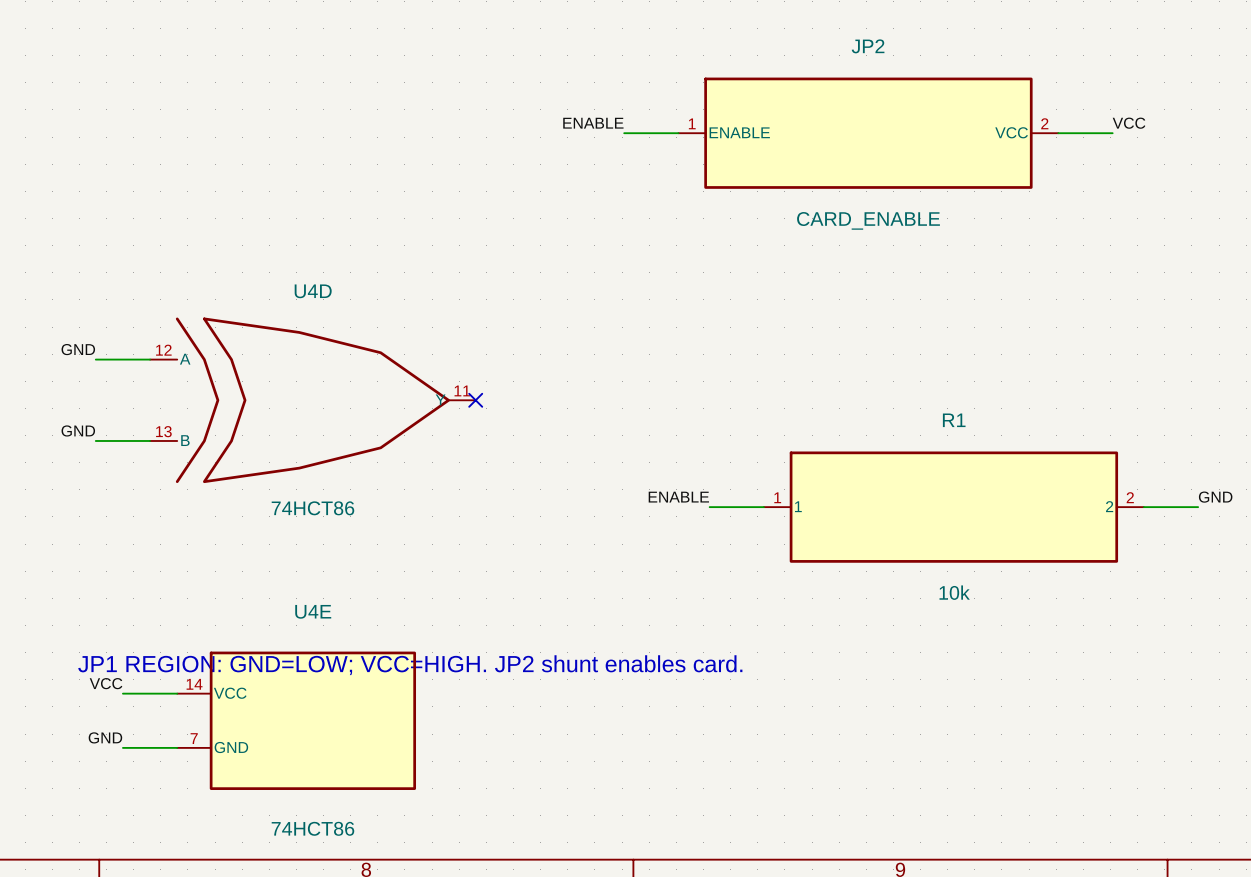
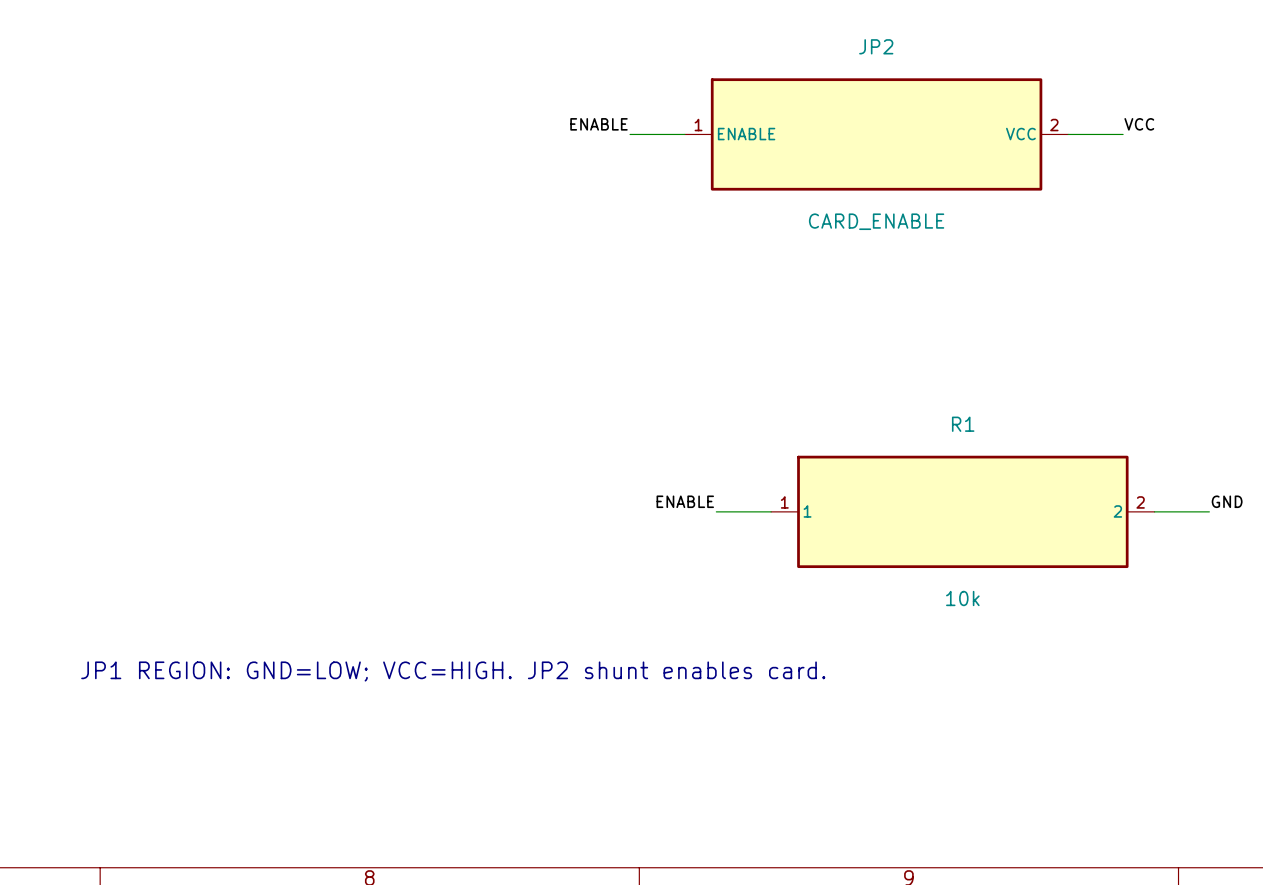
label: GND (78, 349) -> none
wire: (95, 359) (150, 359) -> none
U4D: 74HCT86 (312, 400) -> none
no-connect mark: (475, 400) -> none
label: GND (78, 430) -> none
wire: (95, 440) (150, 440) -> none
label: VCC (106, 683) -> none
wire: (122, 693) (177, 693) -> none
U4E: 74HCT86 (296, 720) -> none
label: GND (105, 737) -> none
wire: (122, 747) (177, 747) -> none

